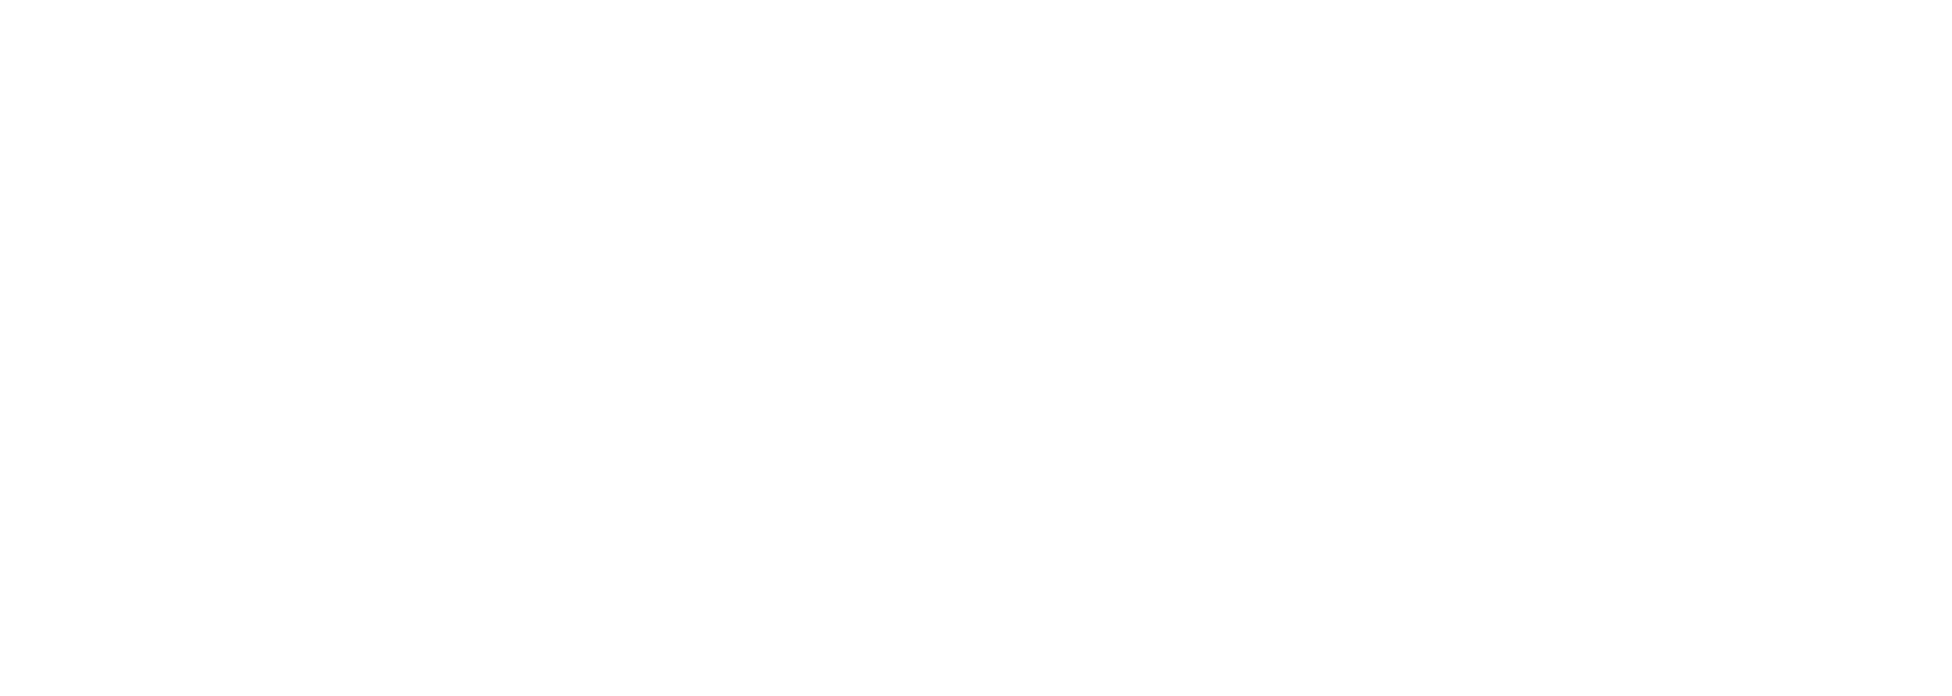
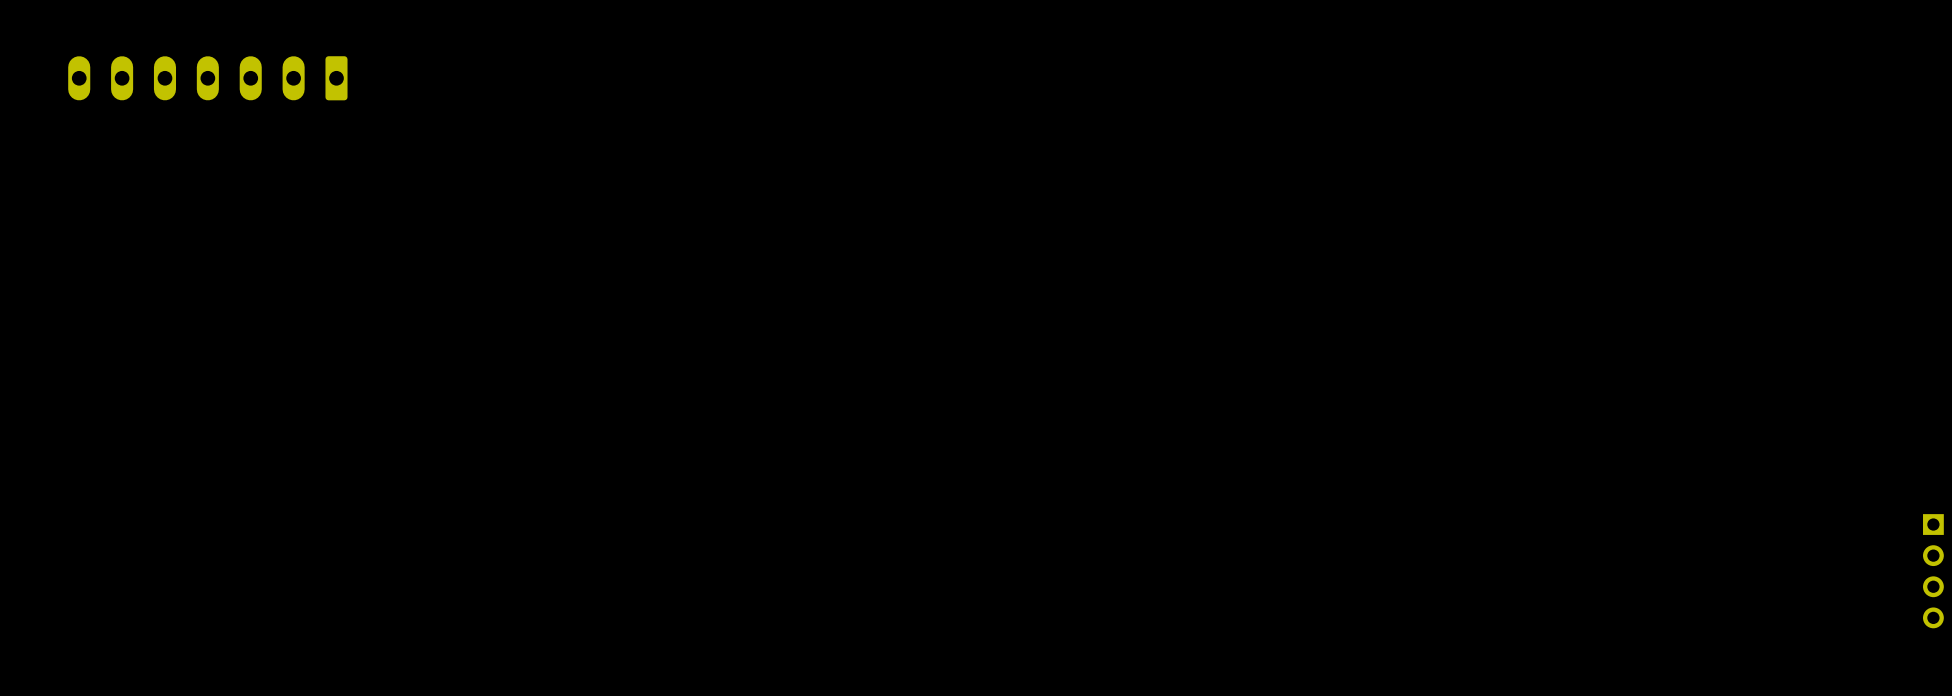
part: none -> (207, 78)
part: none -> (1933, 571)

